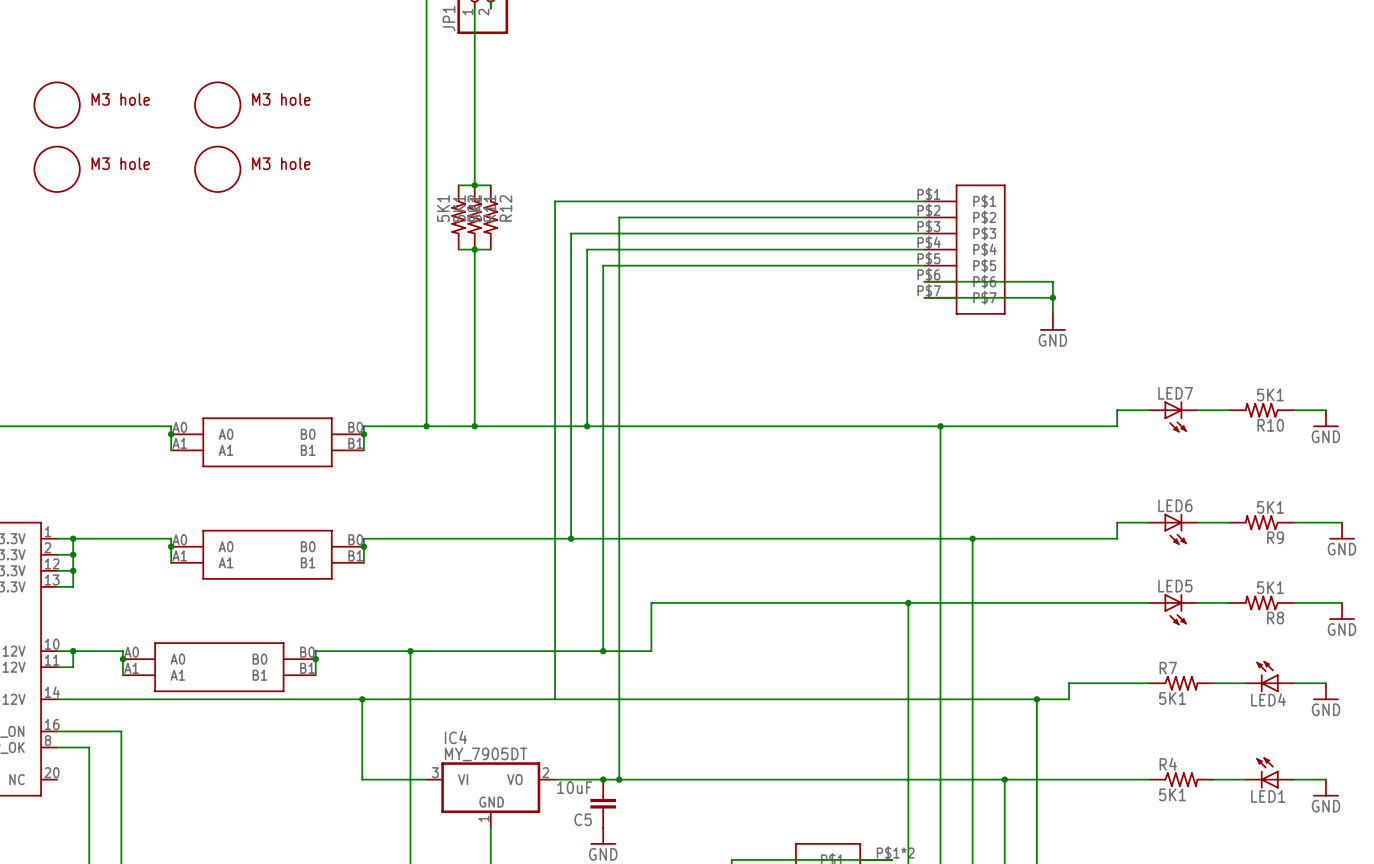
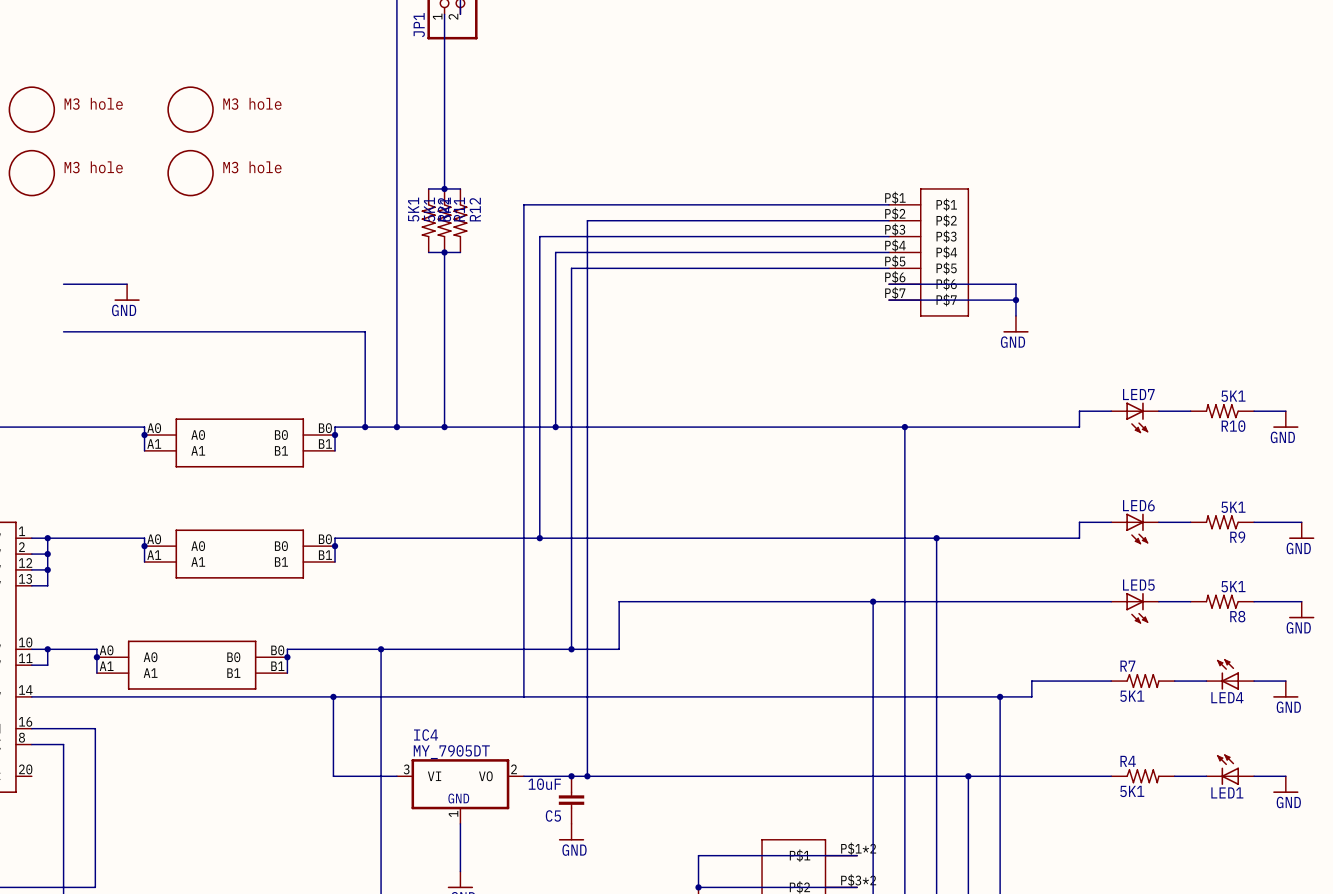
wire: none -> (63, 284) (127, 284)
power symbol: none -> GND (127, 292)
wire: none -> (63, 331) (365, 331) (365, 427)
junction: none -> (365, 427)

